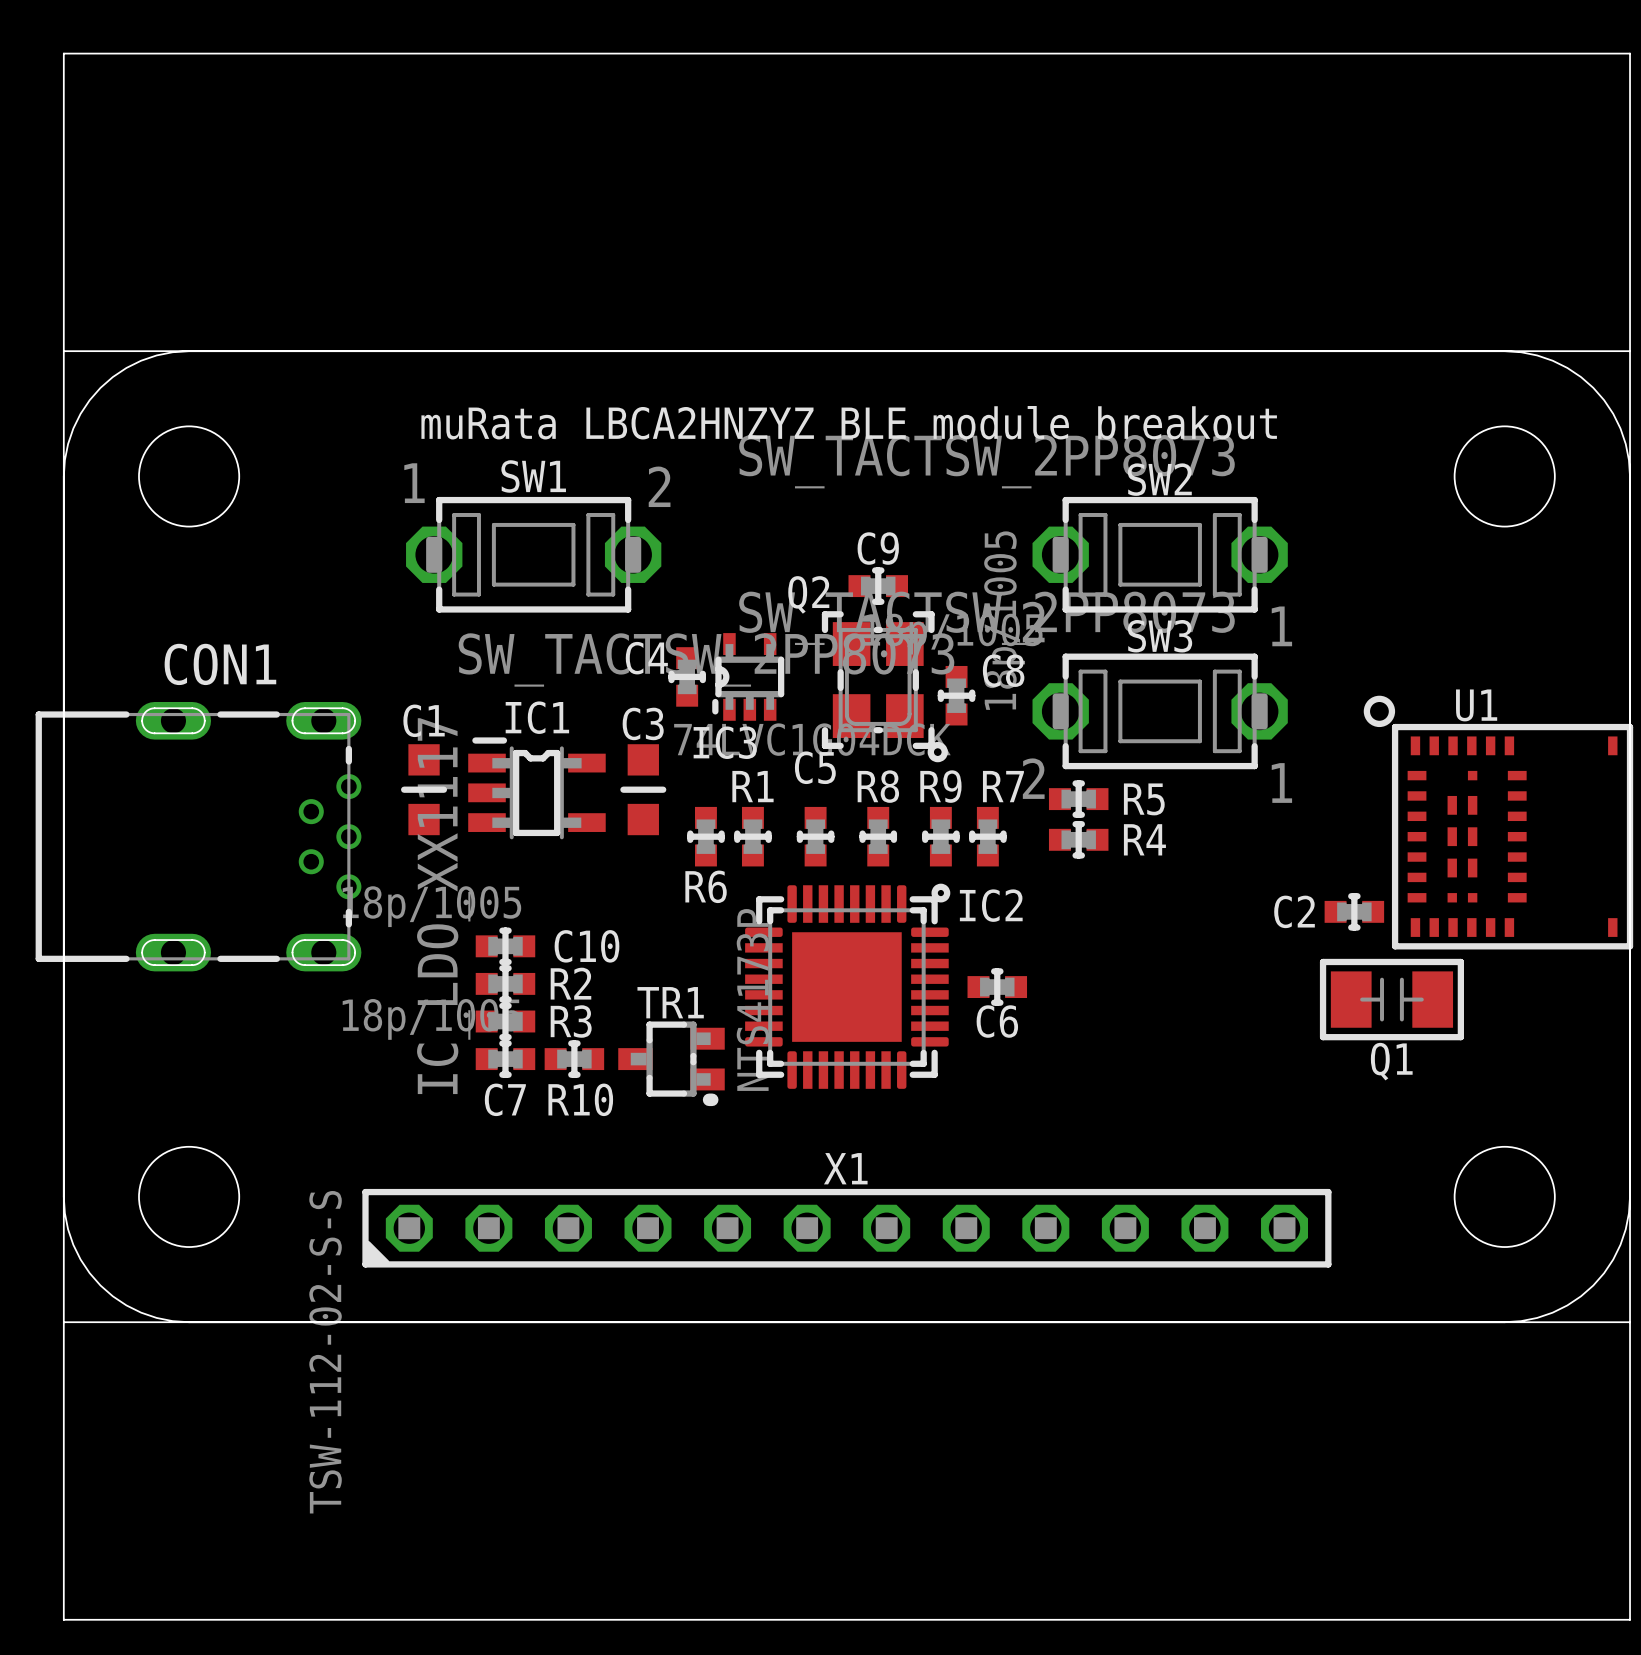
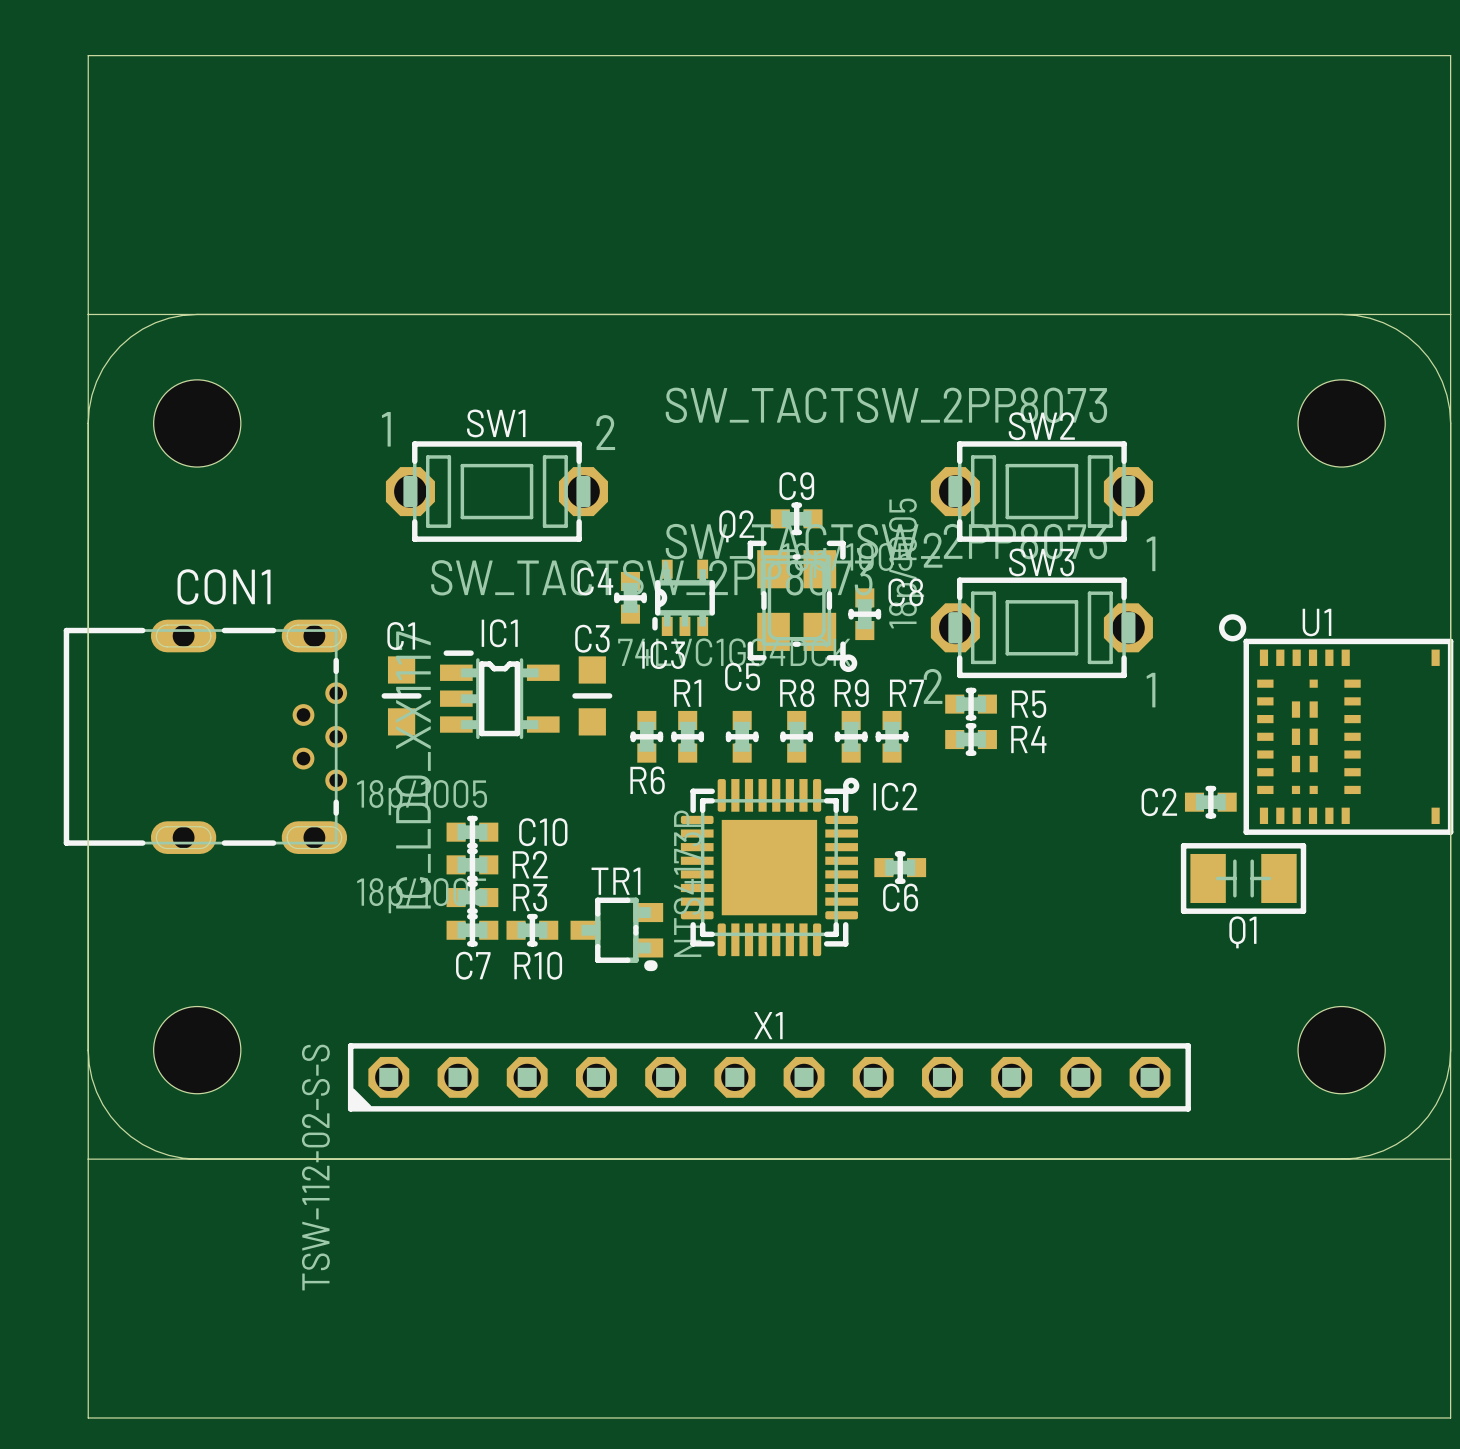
text: muRata LBCA2HNZYZ BLE module breakout (849, 422) -> none

